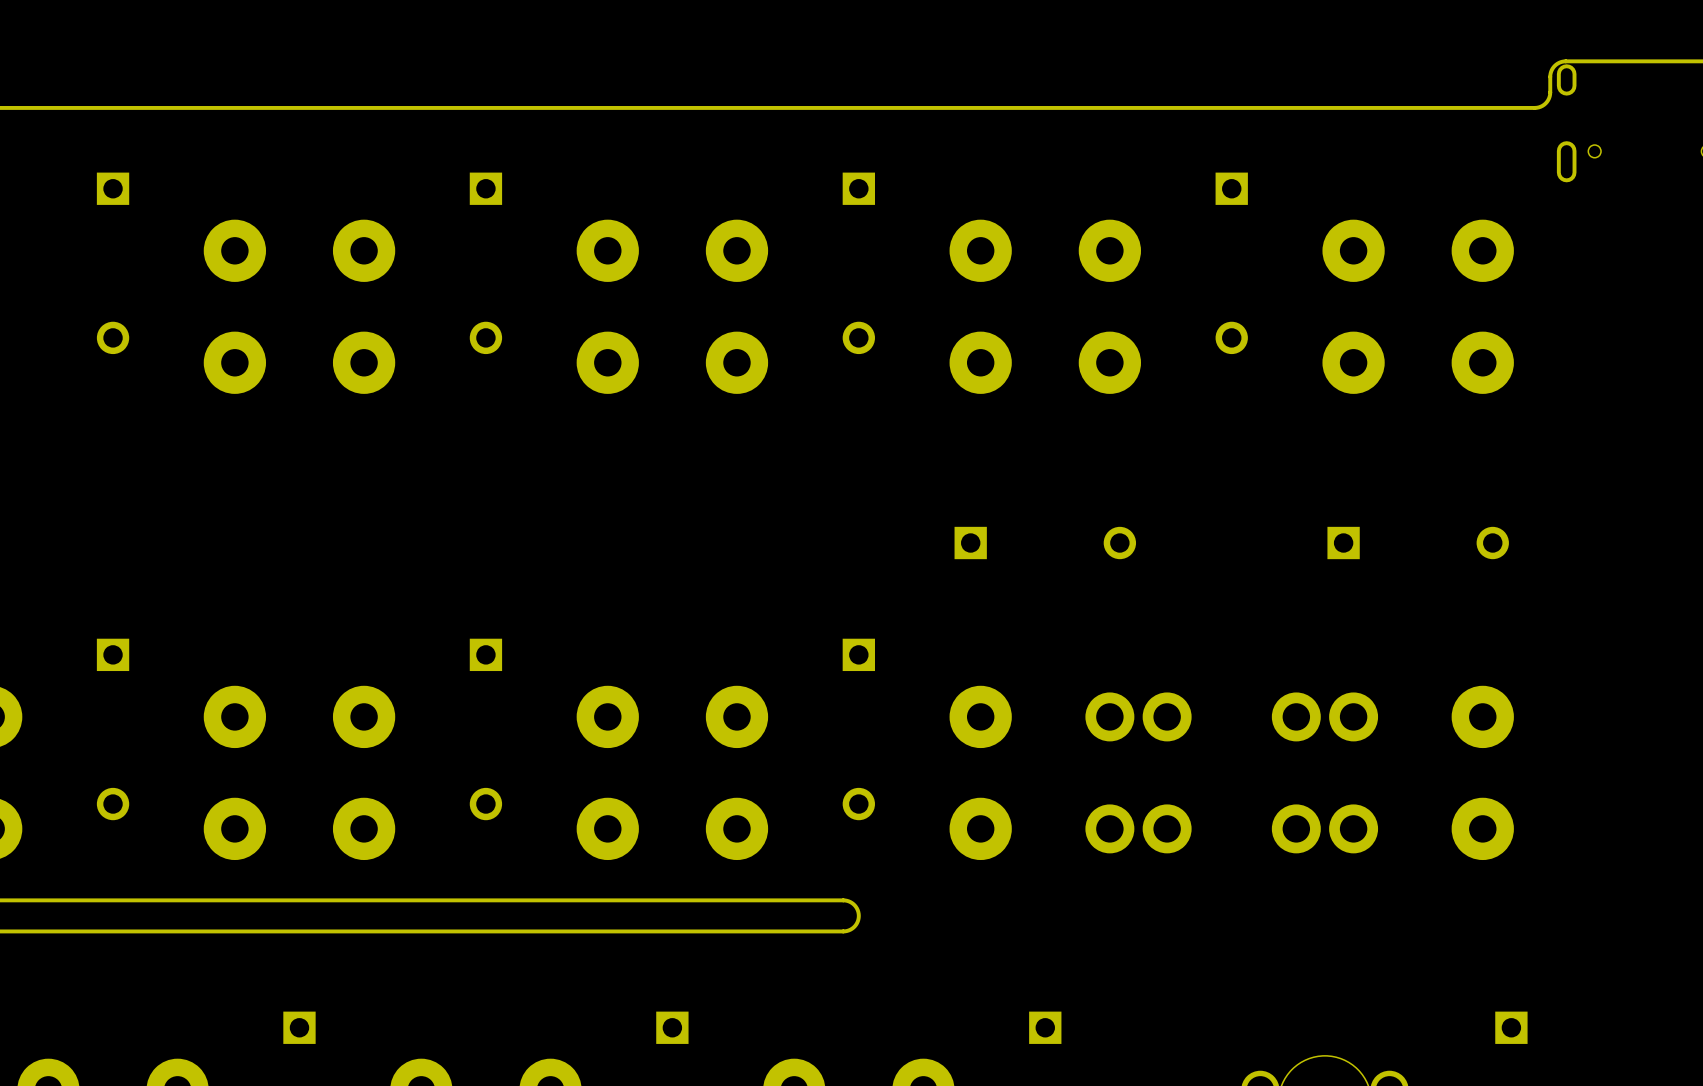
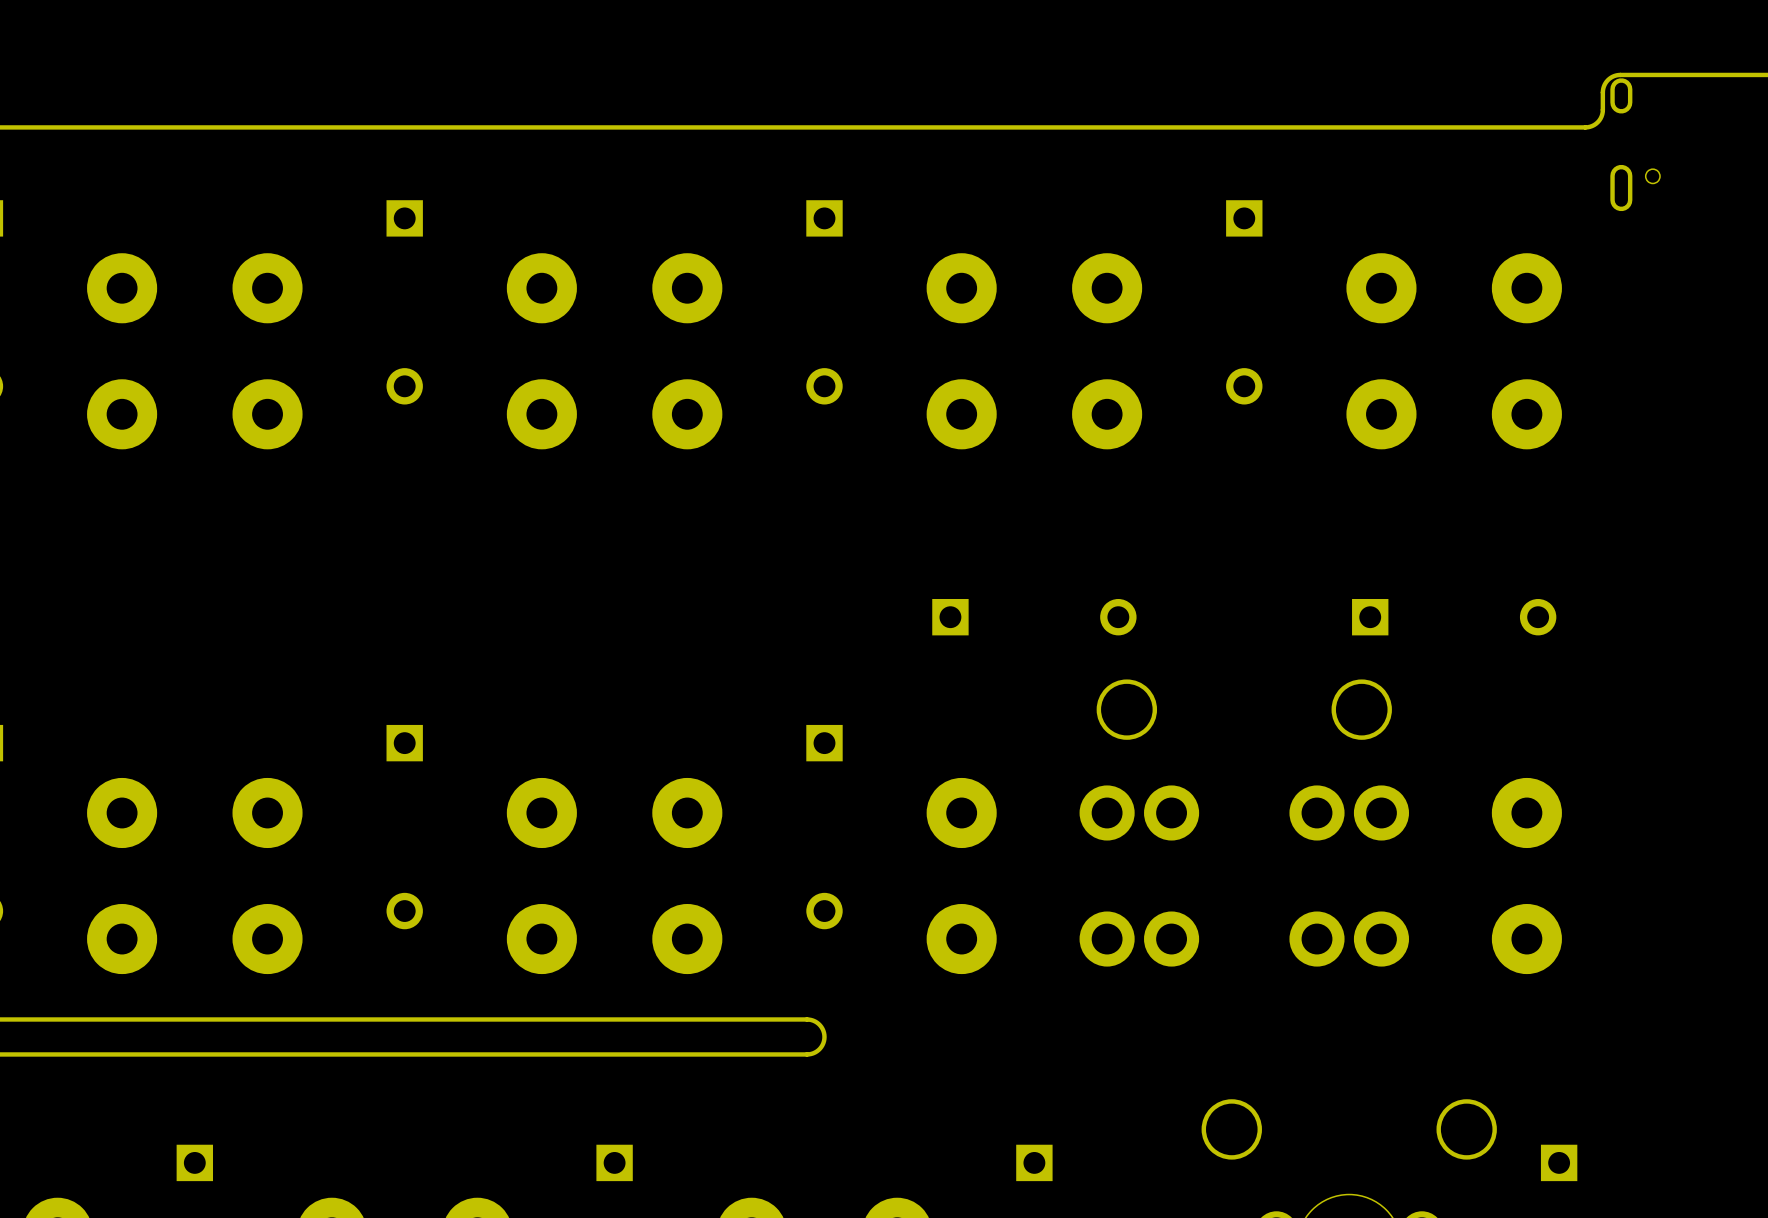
round board edge: none -> [1096, 679, 1158, 740]
round board edge: none -> [1331, 679, 1392, 740]
round board edge: none -> [1201, 1099, 1262, 1160]
round board edge: none -> [1436, 1099, 1497, 1160]

